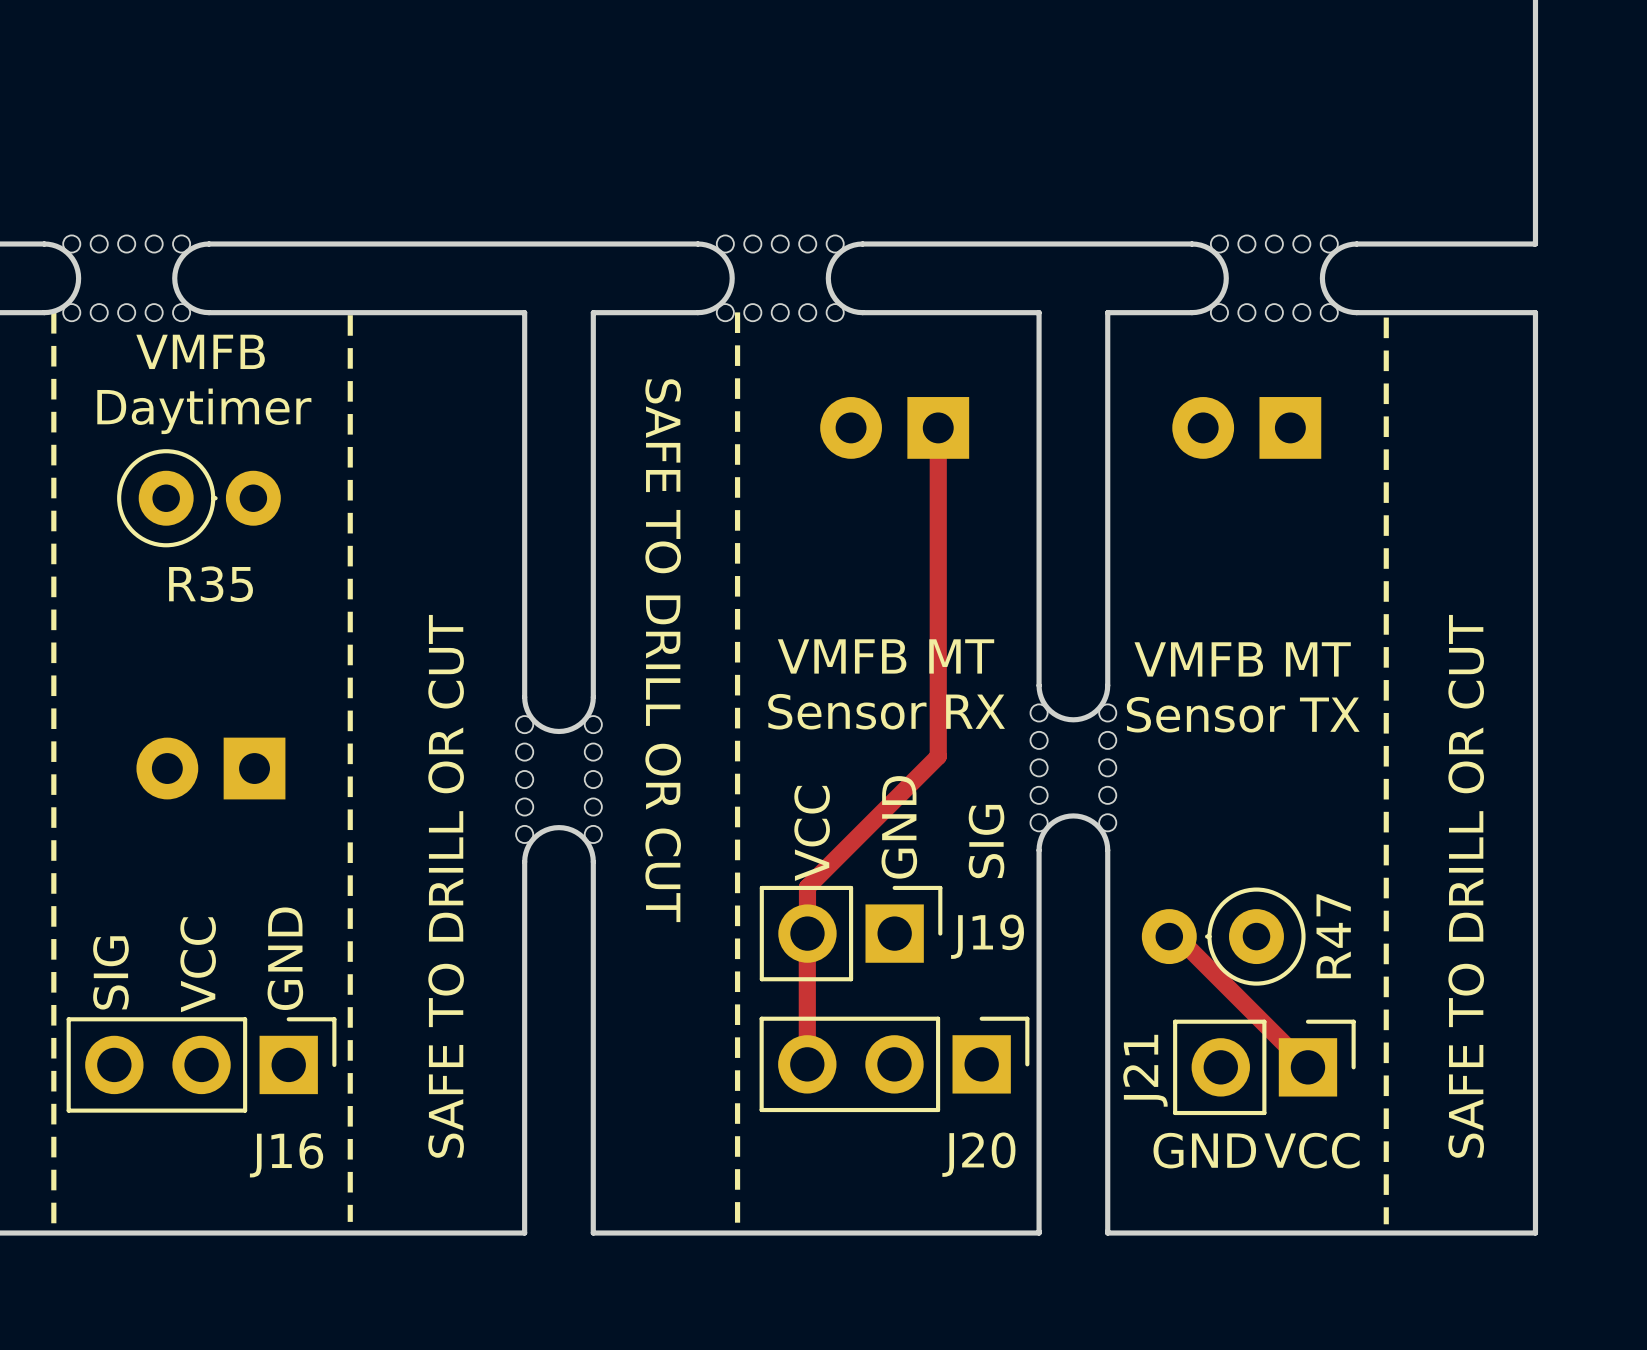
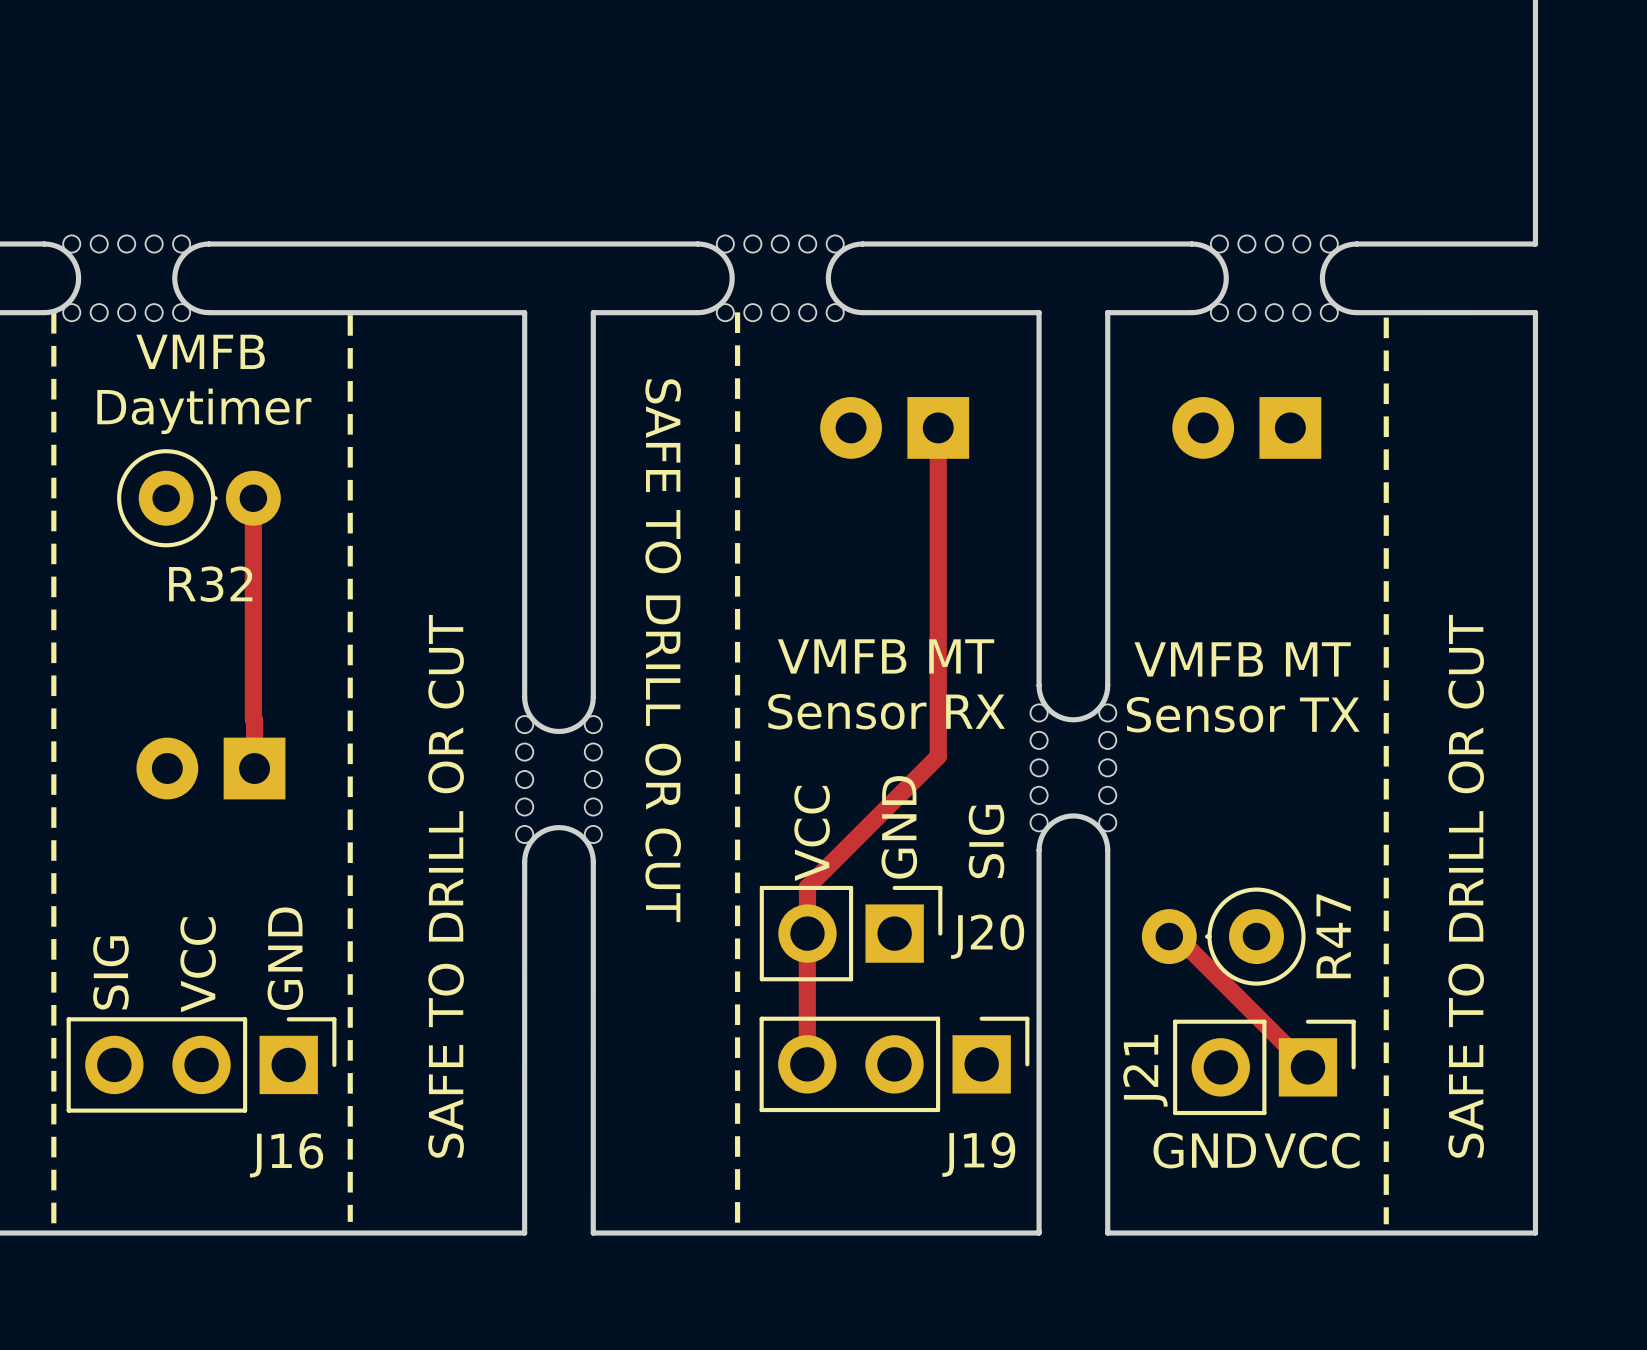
track: none -> (253, 498) (254, 768)
R35 name: R35 (211, 584) -> R32 (210, 584)
J19 name: J19 (987, 936) -> J20 (987, 936)
J20 name: J20 (978, 1154) -> J19 (978, 1154)

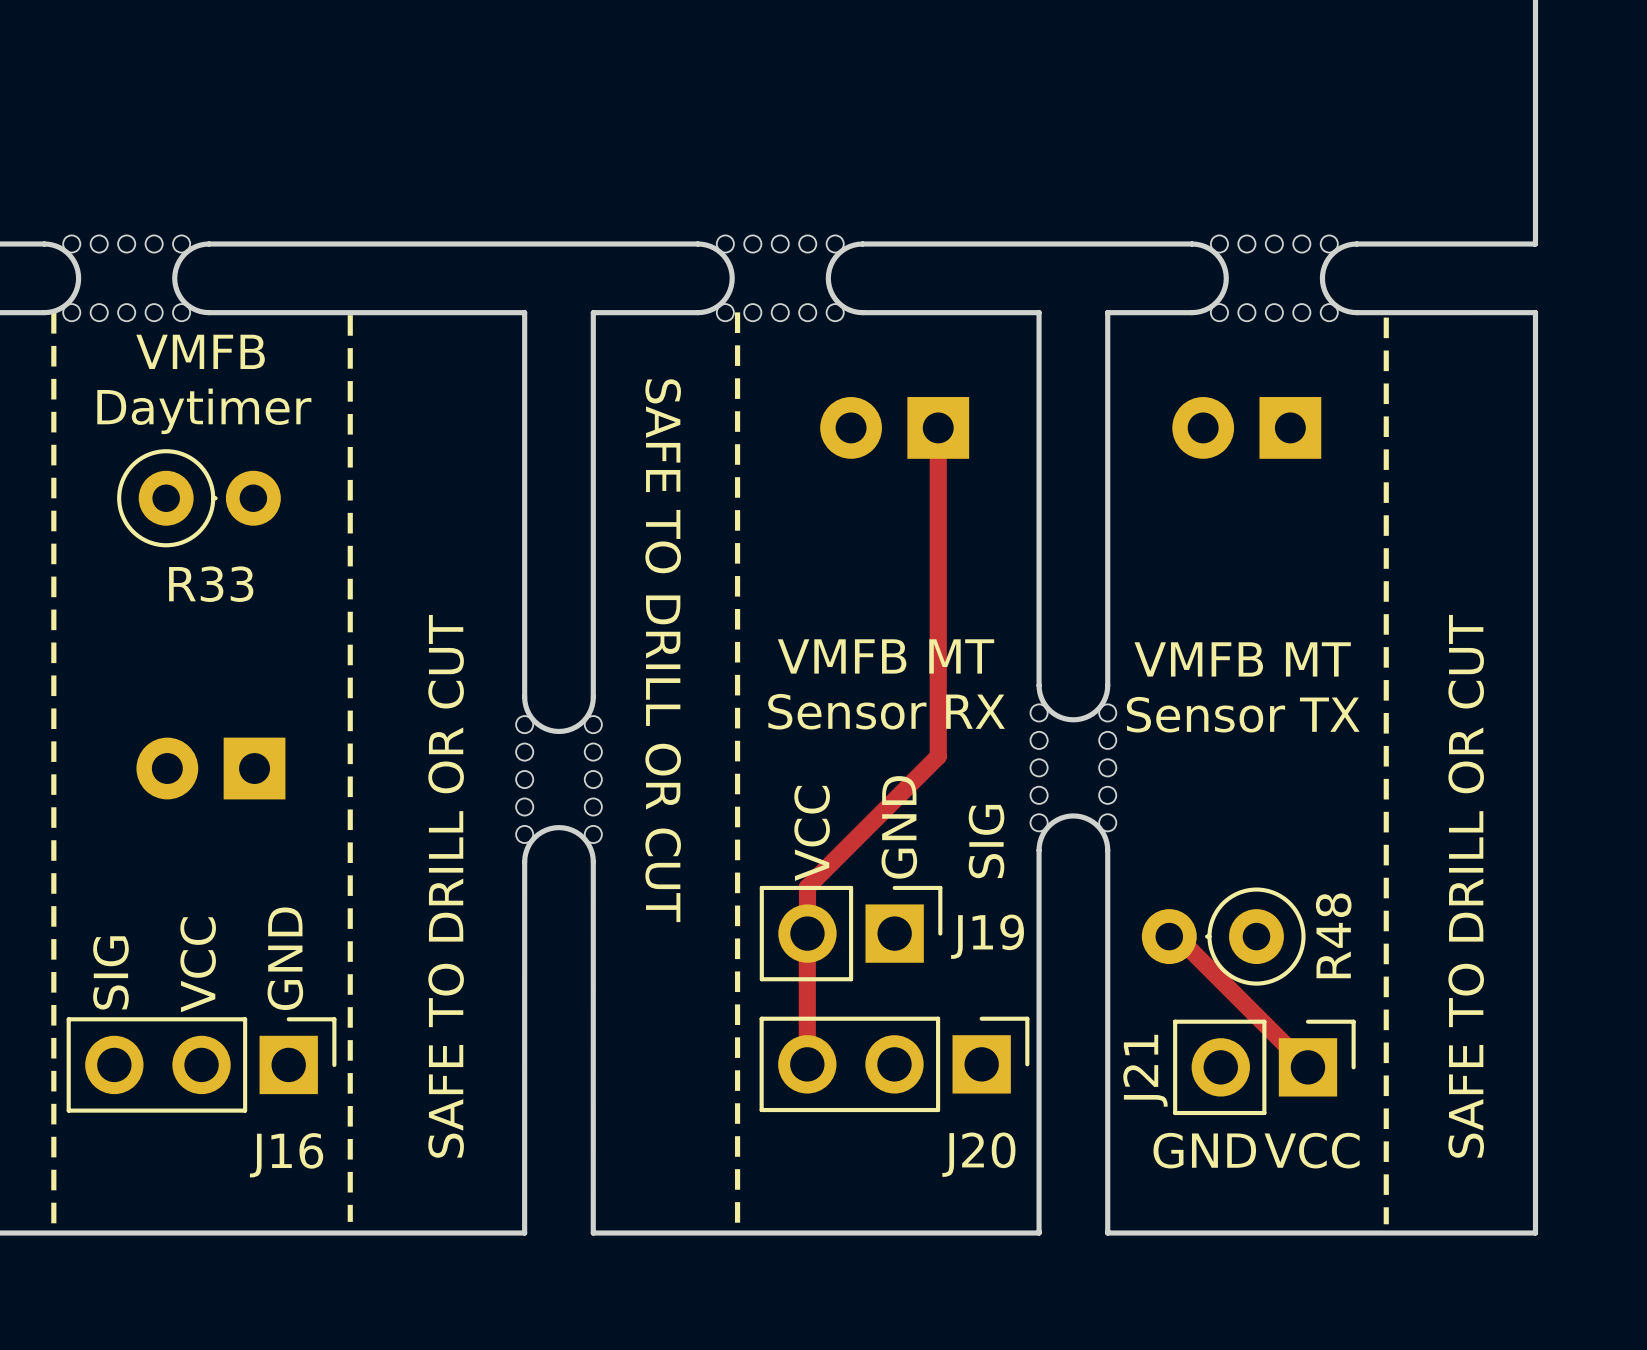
track: (253, 498) (254, 768) -> none
R32 name: R32 (210, 584) -> R33 (211, 584)
J20 name: J20 (987, 936) -> J19 (987, 936)
R47 name: R47 (1333, 936) -> R48 (1333, 935)
J19 name: J19 (978, 1154) -> J20 (978, 1154)

